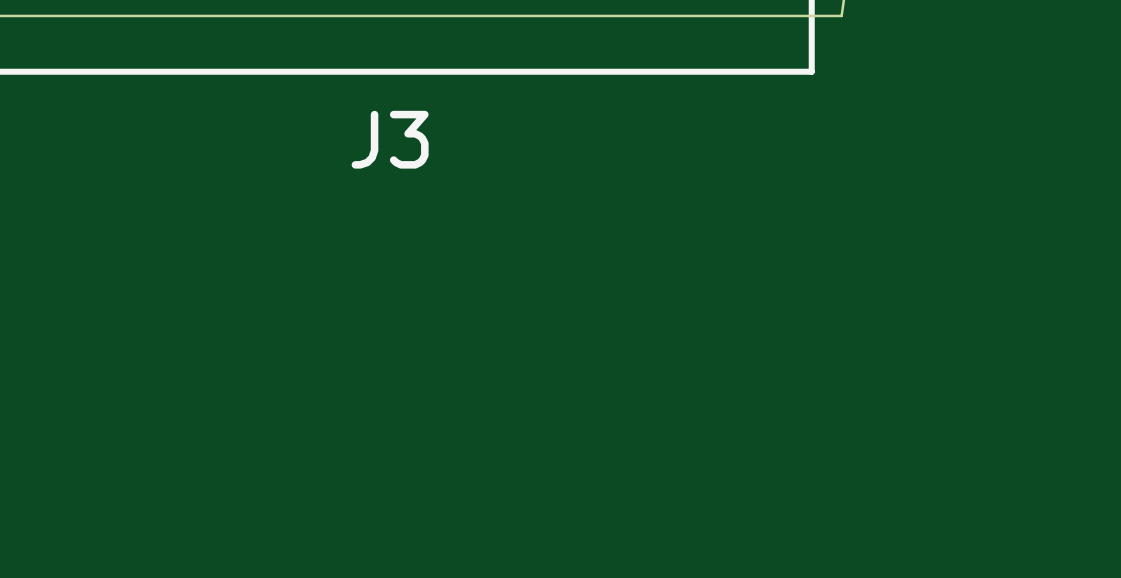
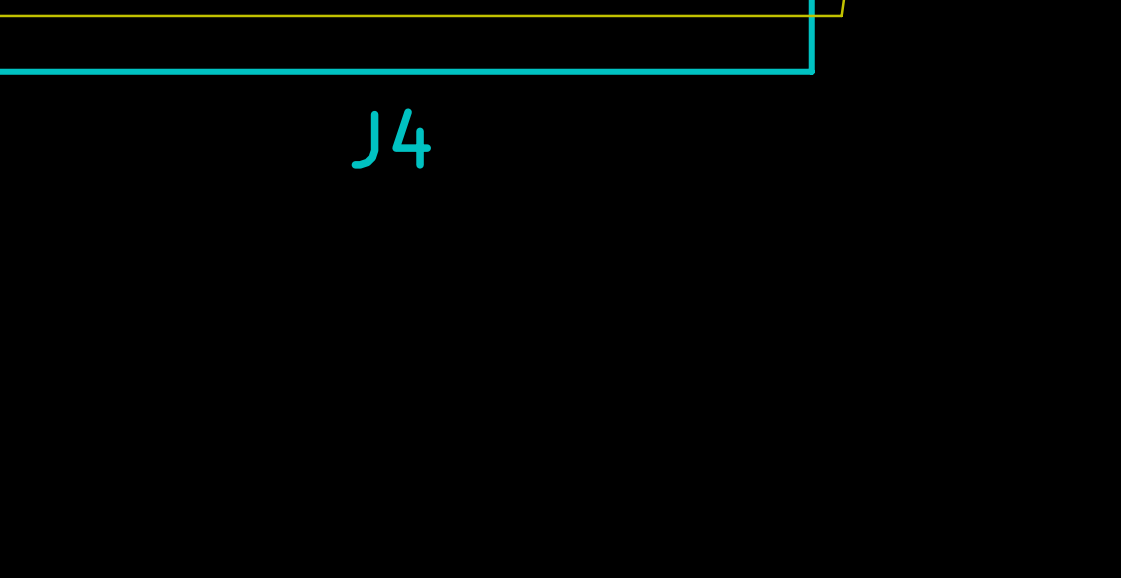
J3 name: J3 (390, 139) -> J4 (391, 138)

